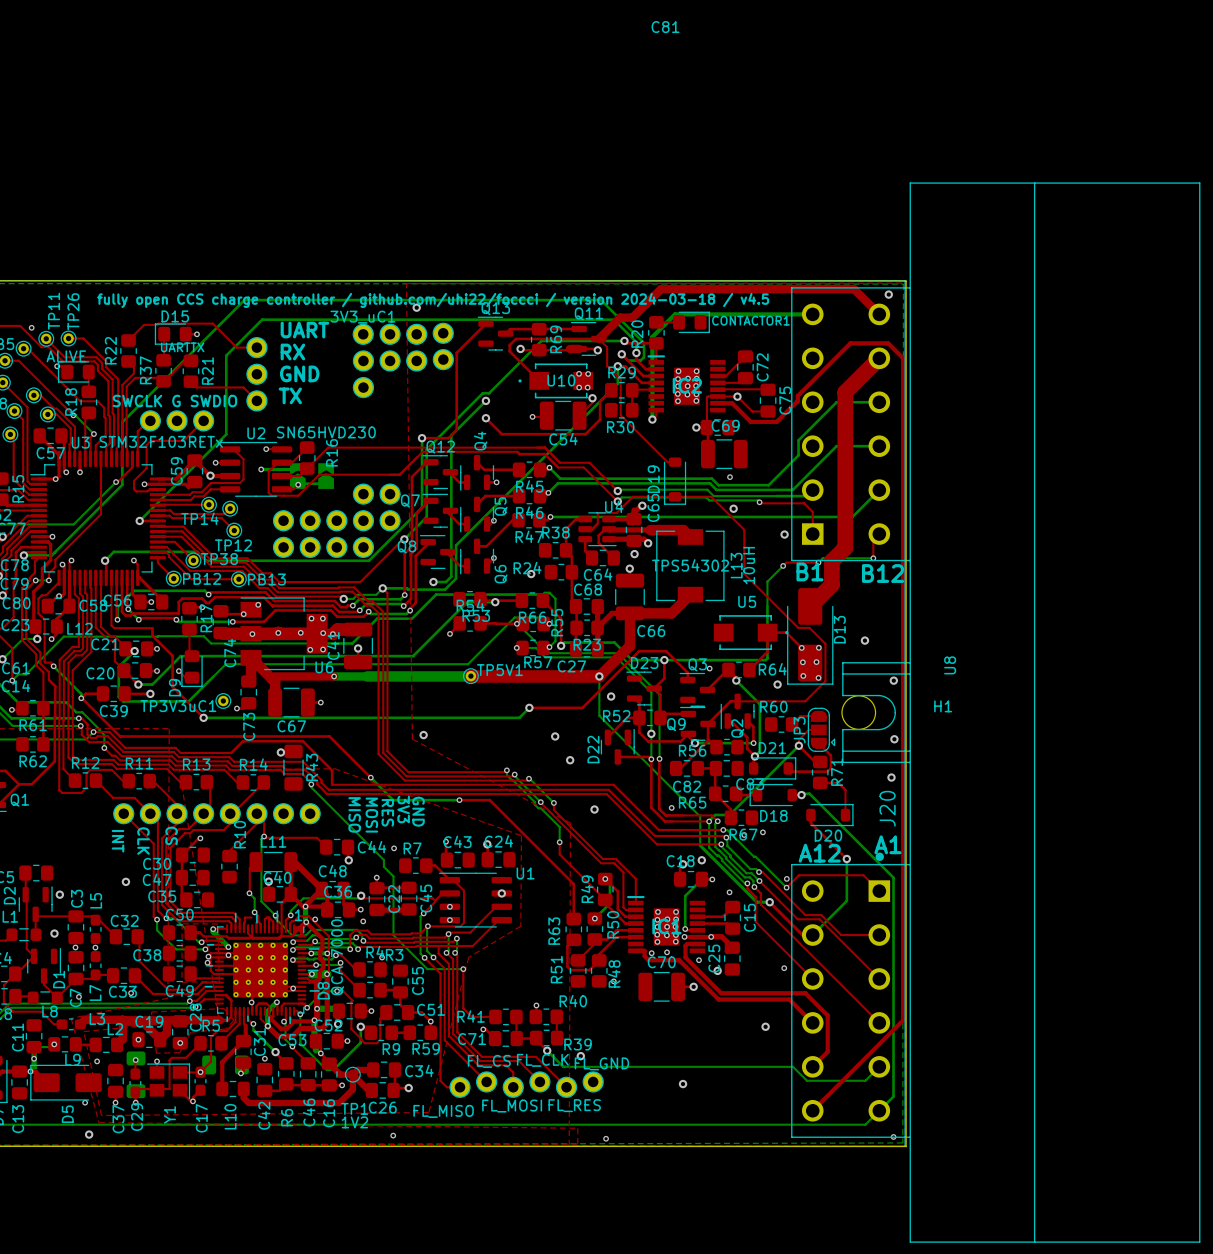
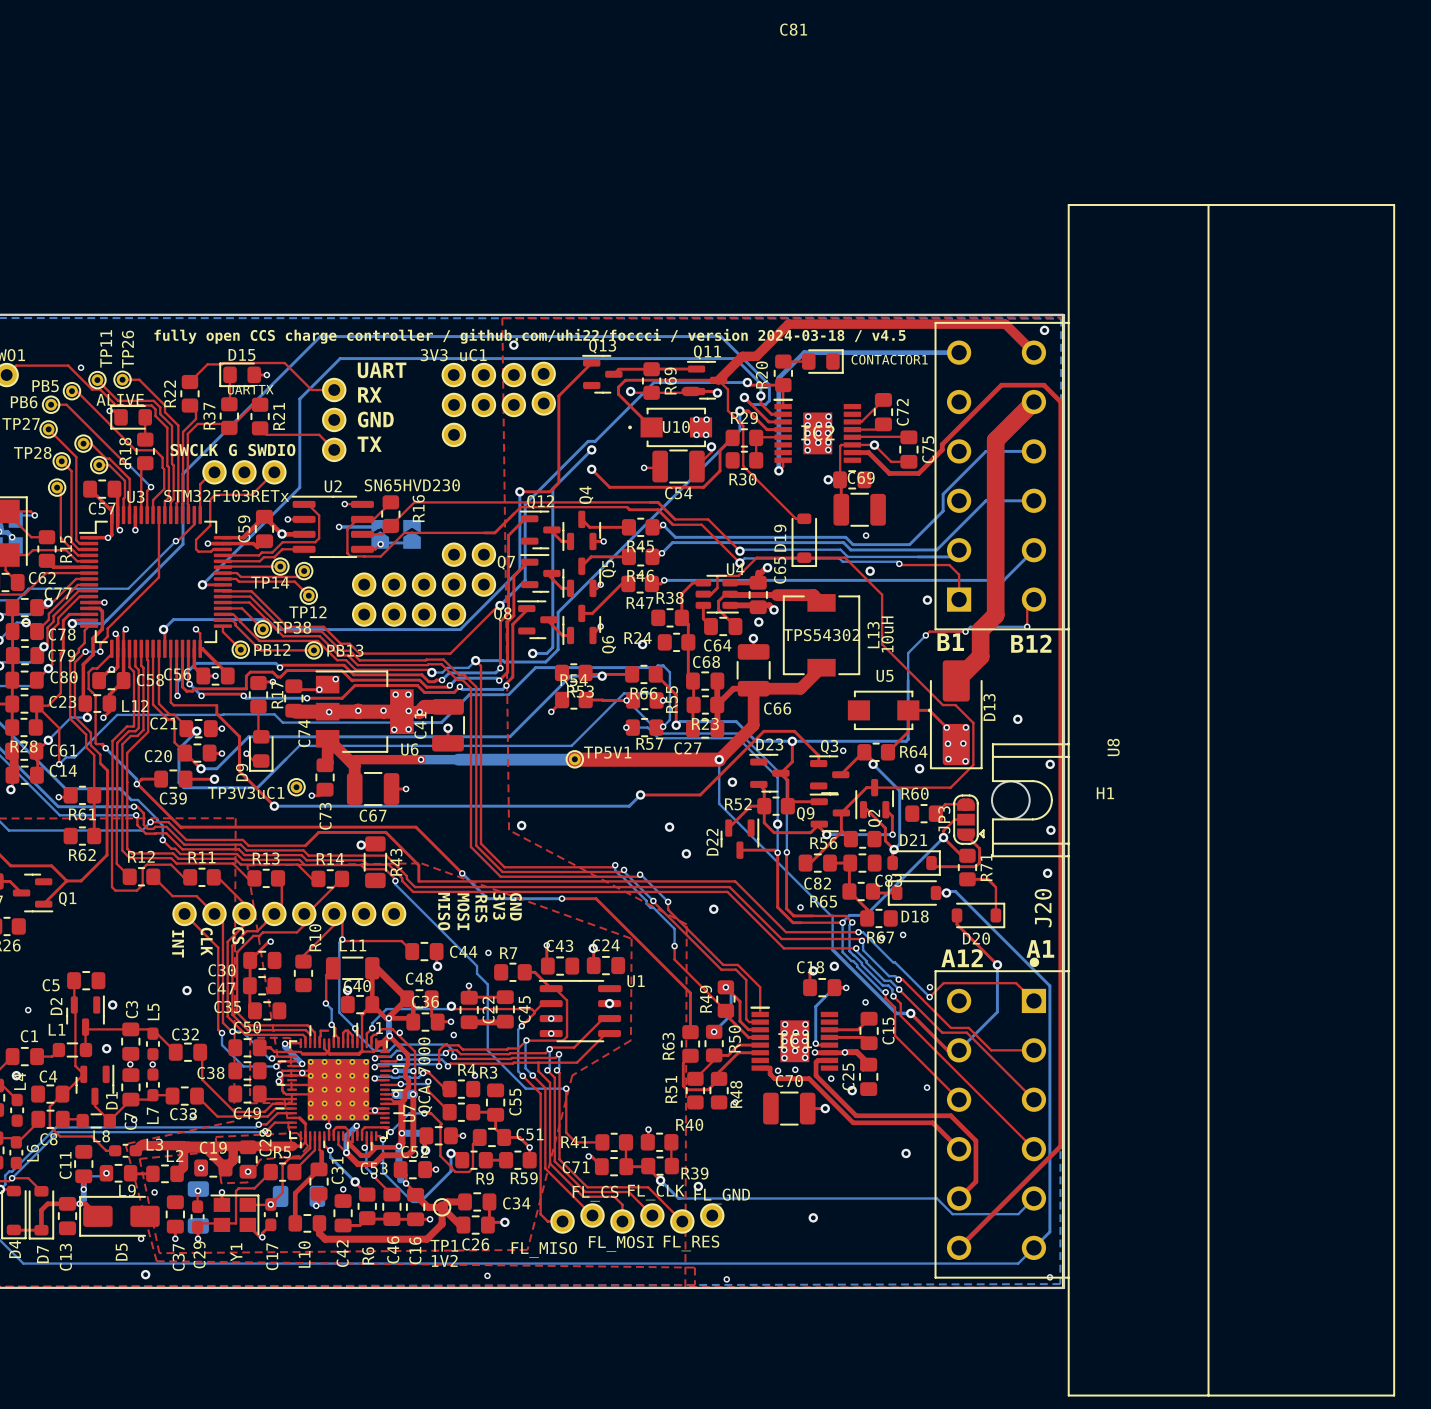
D8 name: D8 (323, 990) -> U7 (409, 1113)

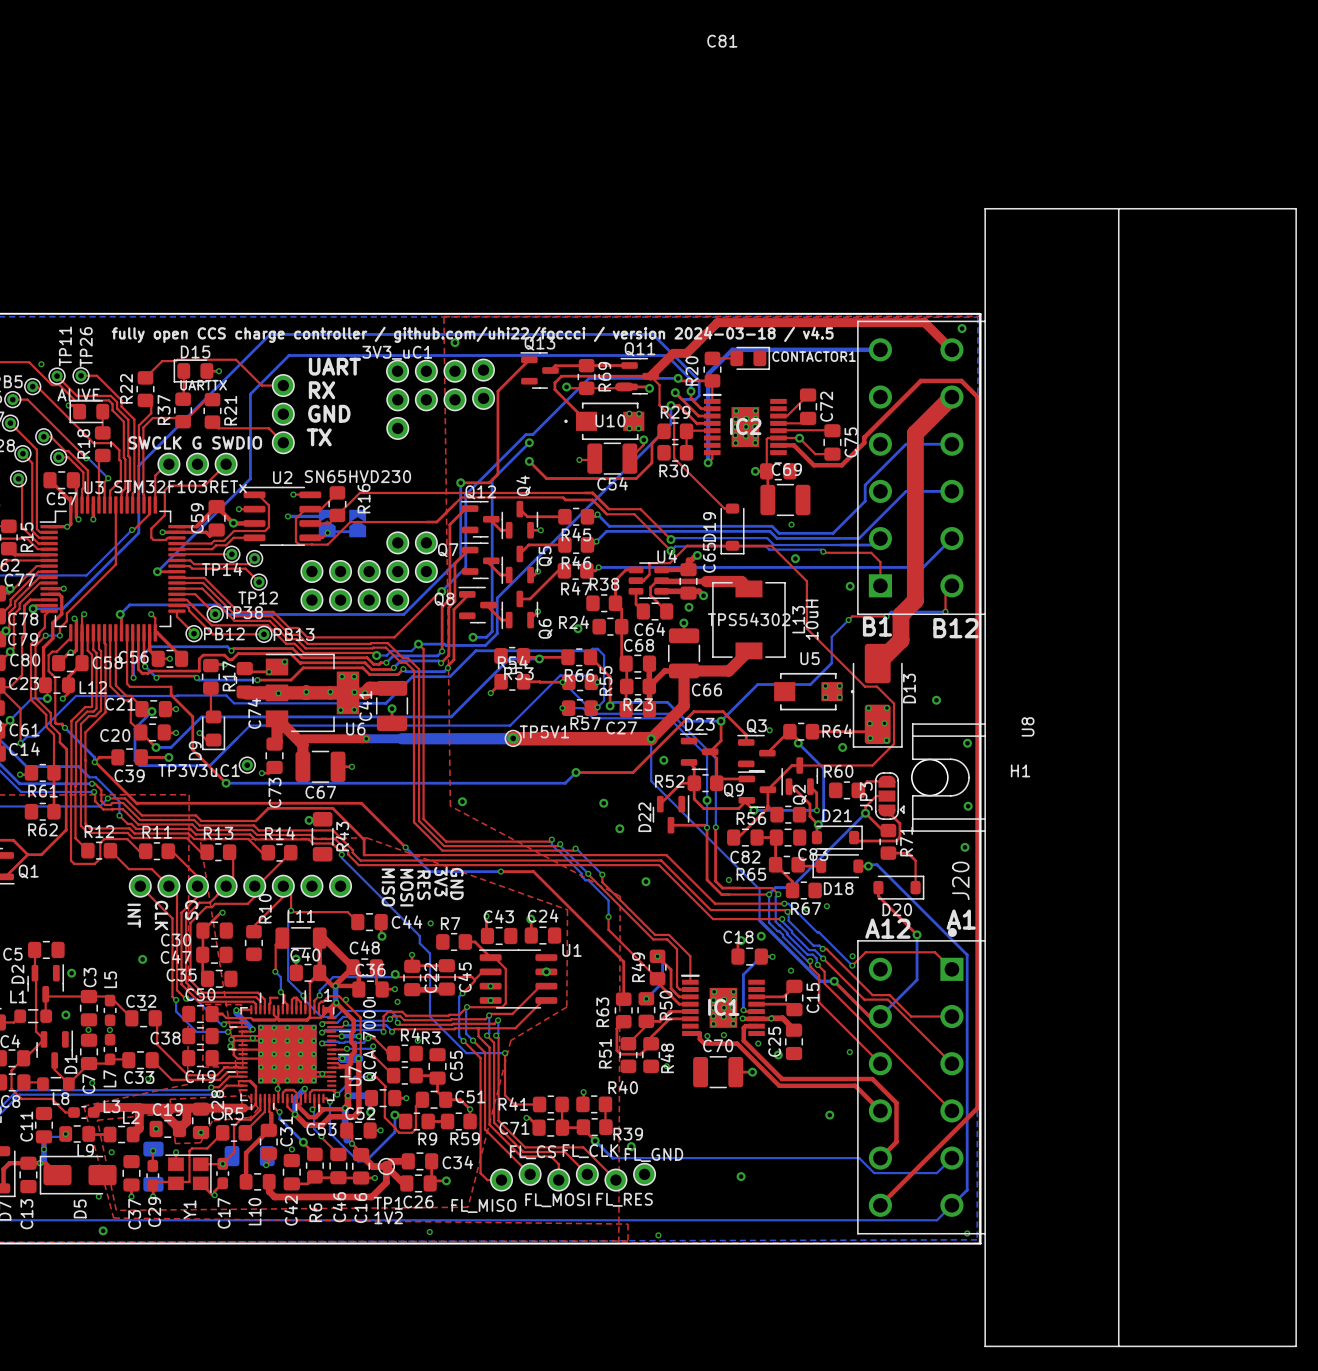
bottom track: (908, 680) (908, 739) (906, 741) (792, 741) -> (831, 663) (810, 684) (757, 684) (721, 721)
via: none -> (825, 685)
via: none -> (839, 685)
via: none -> (825, 697)
via: none -> (839, 697)
top track: (946, 727) (929, 710) (908, 710) (908, 731) (887, 752) -> (877, 724) (870, 731) (812, 731)

